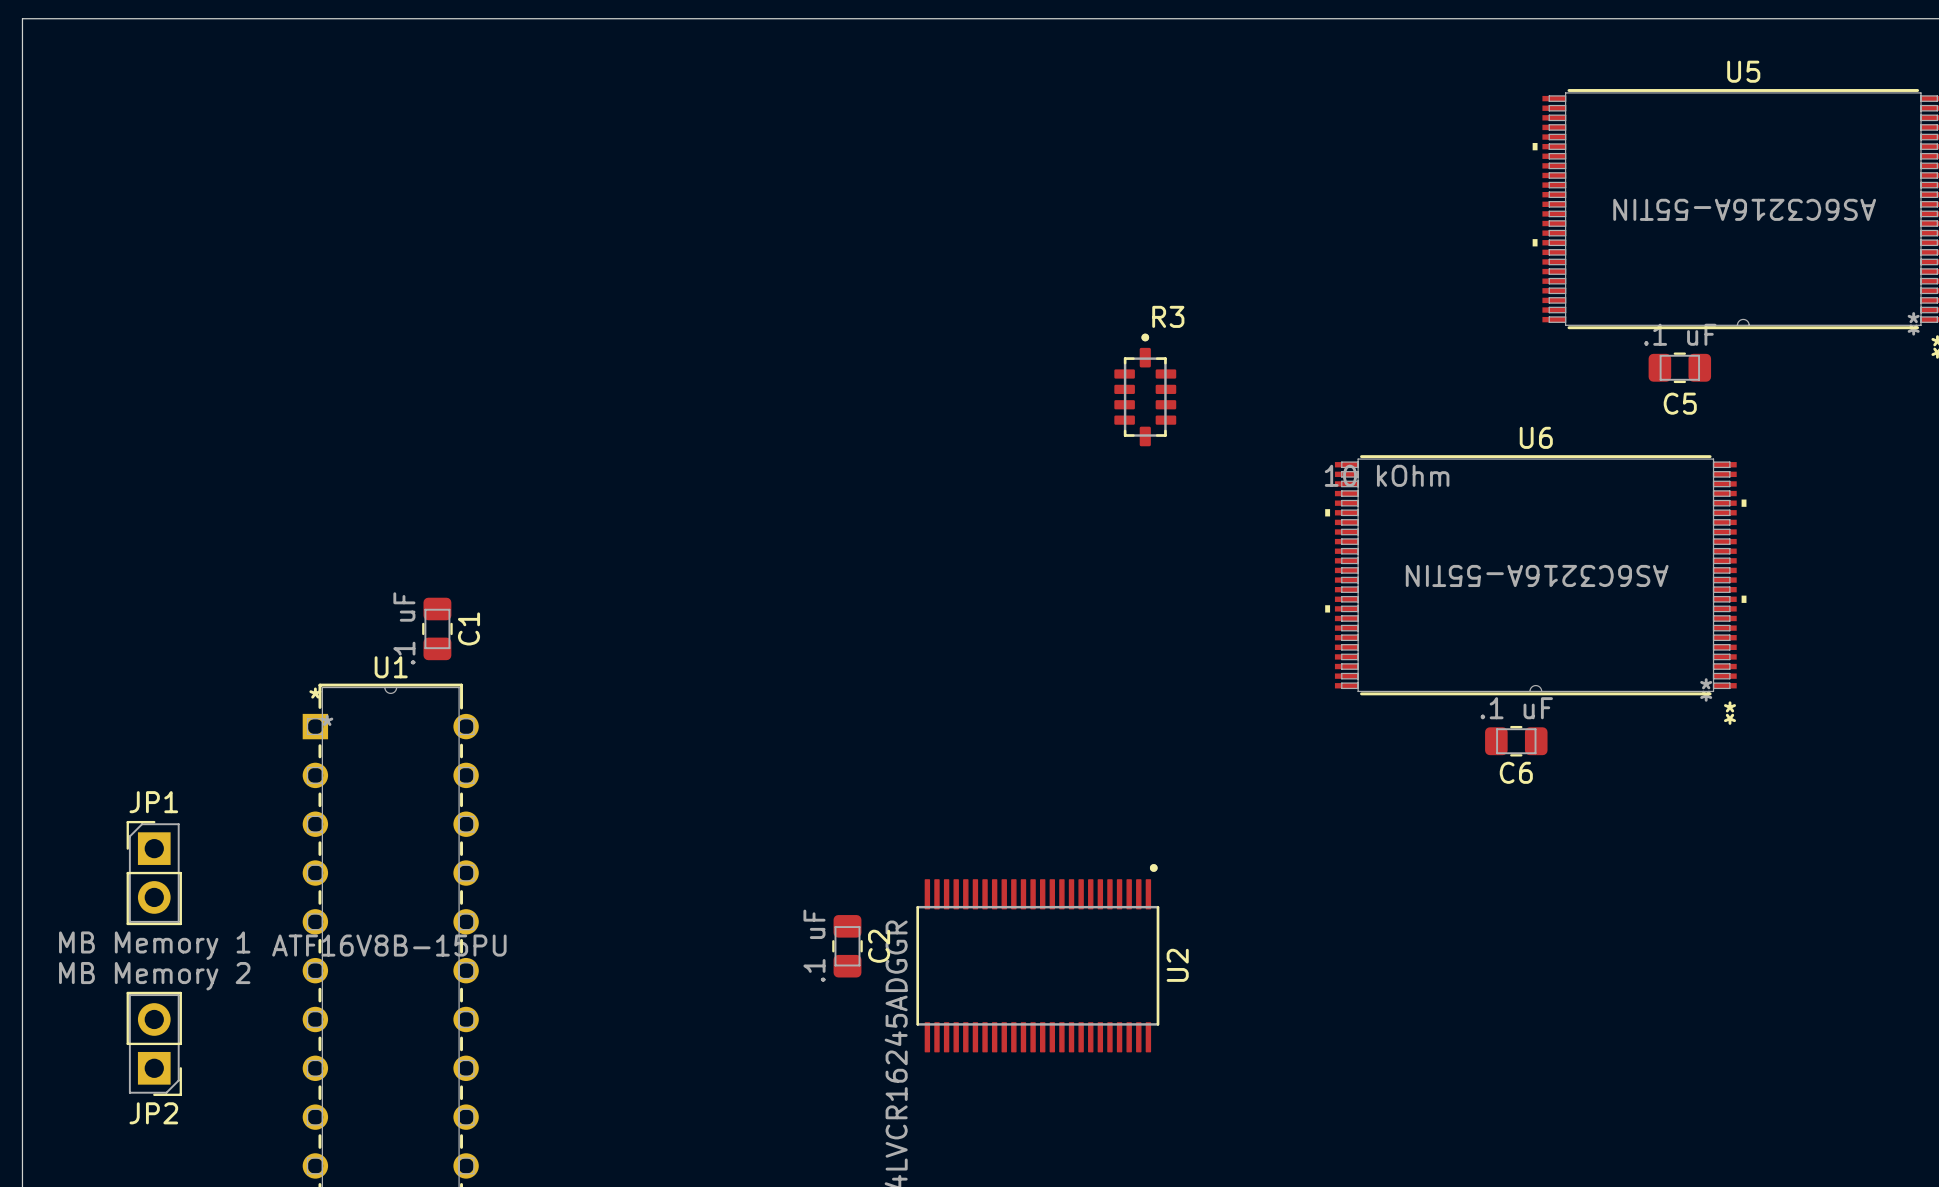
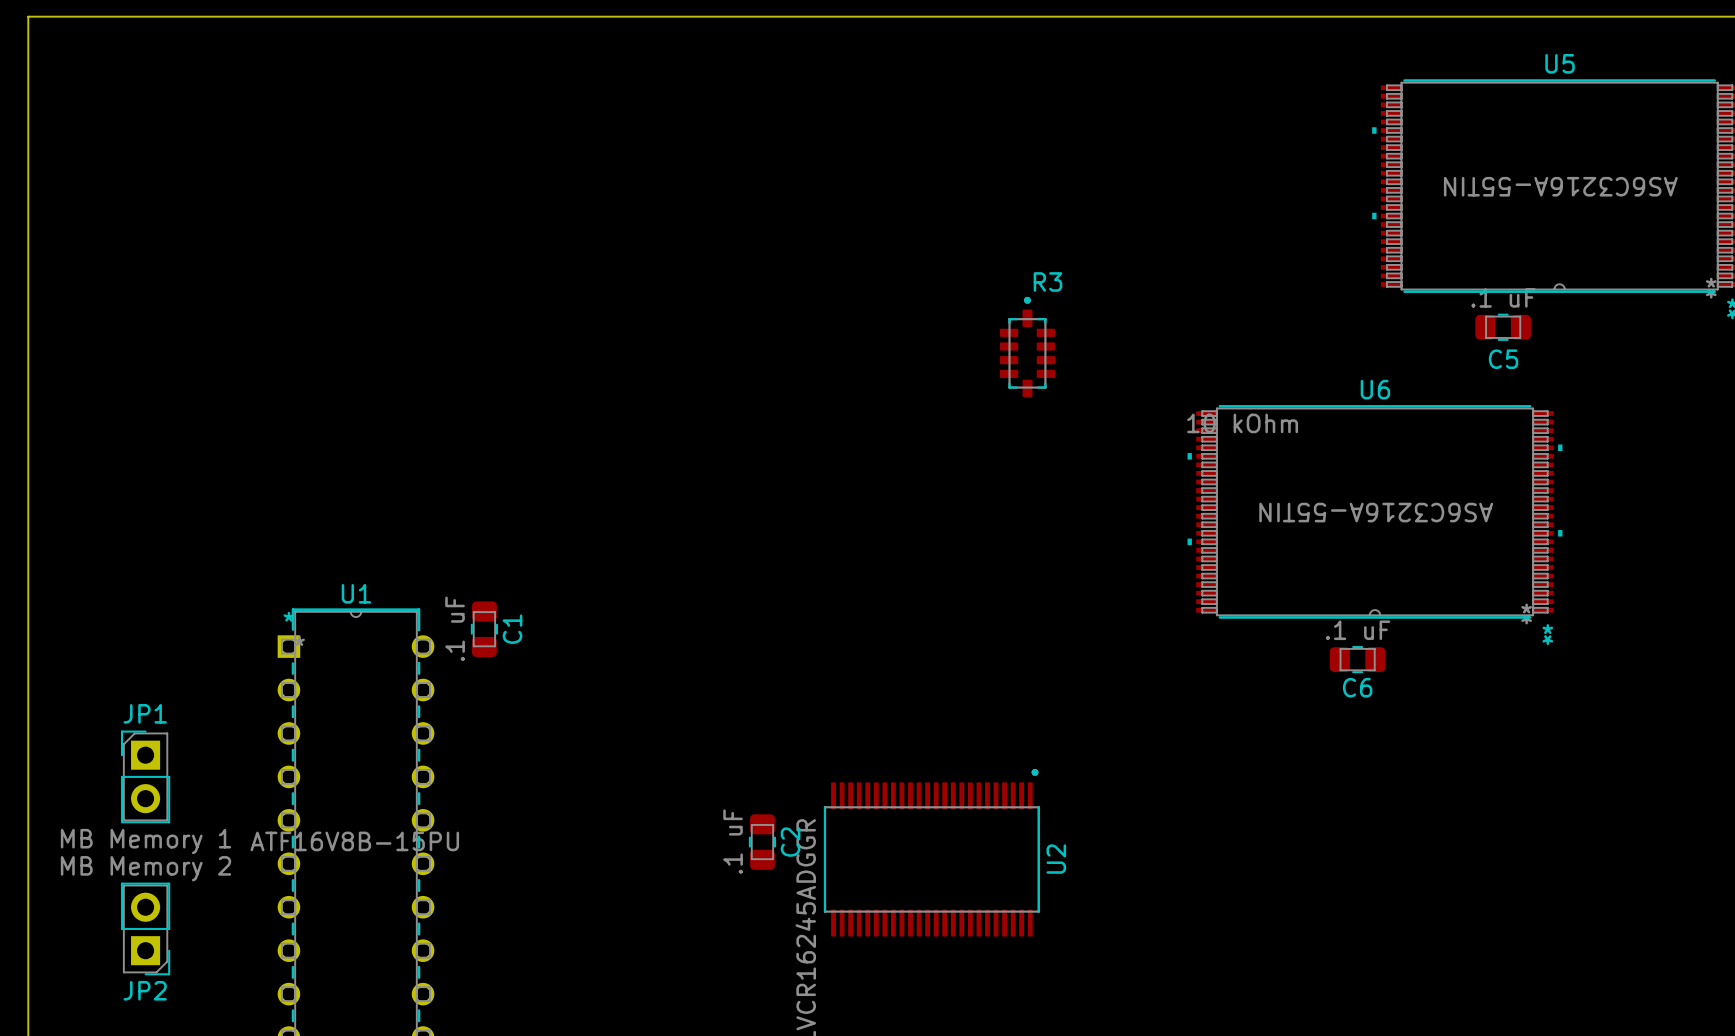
C1 position: (437, 628) -> (484, 629)

